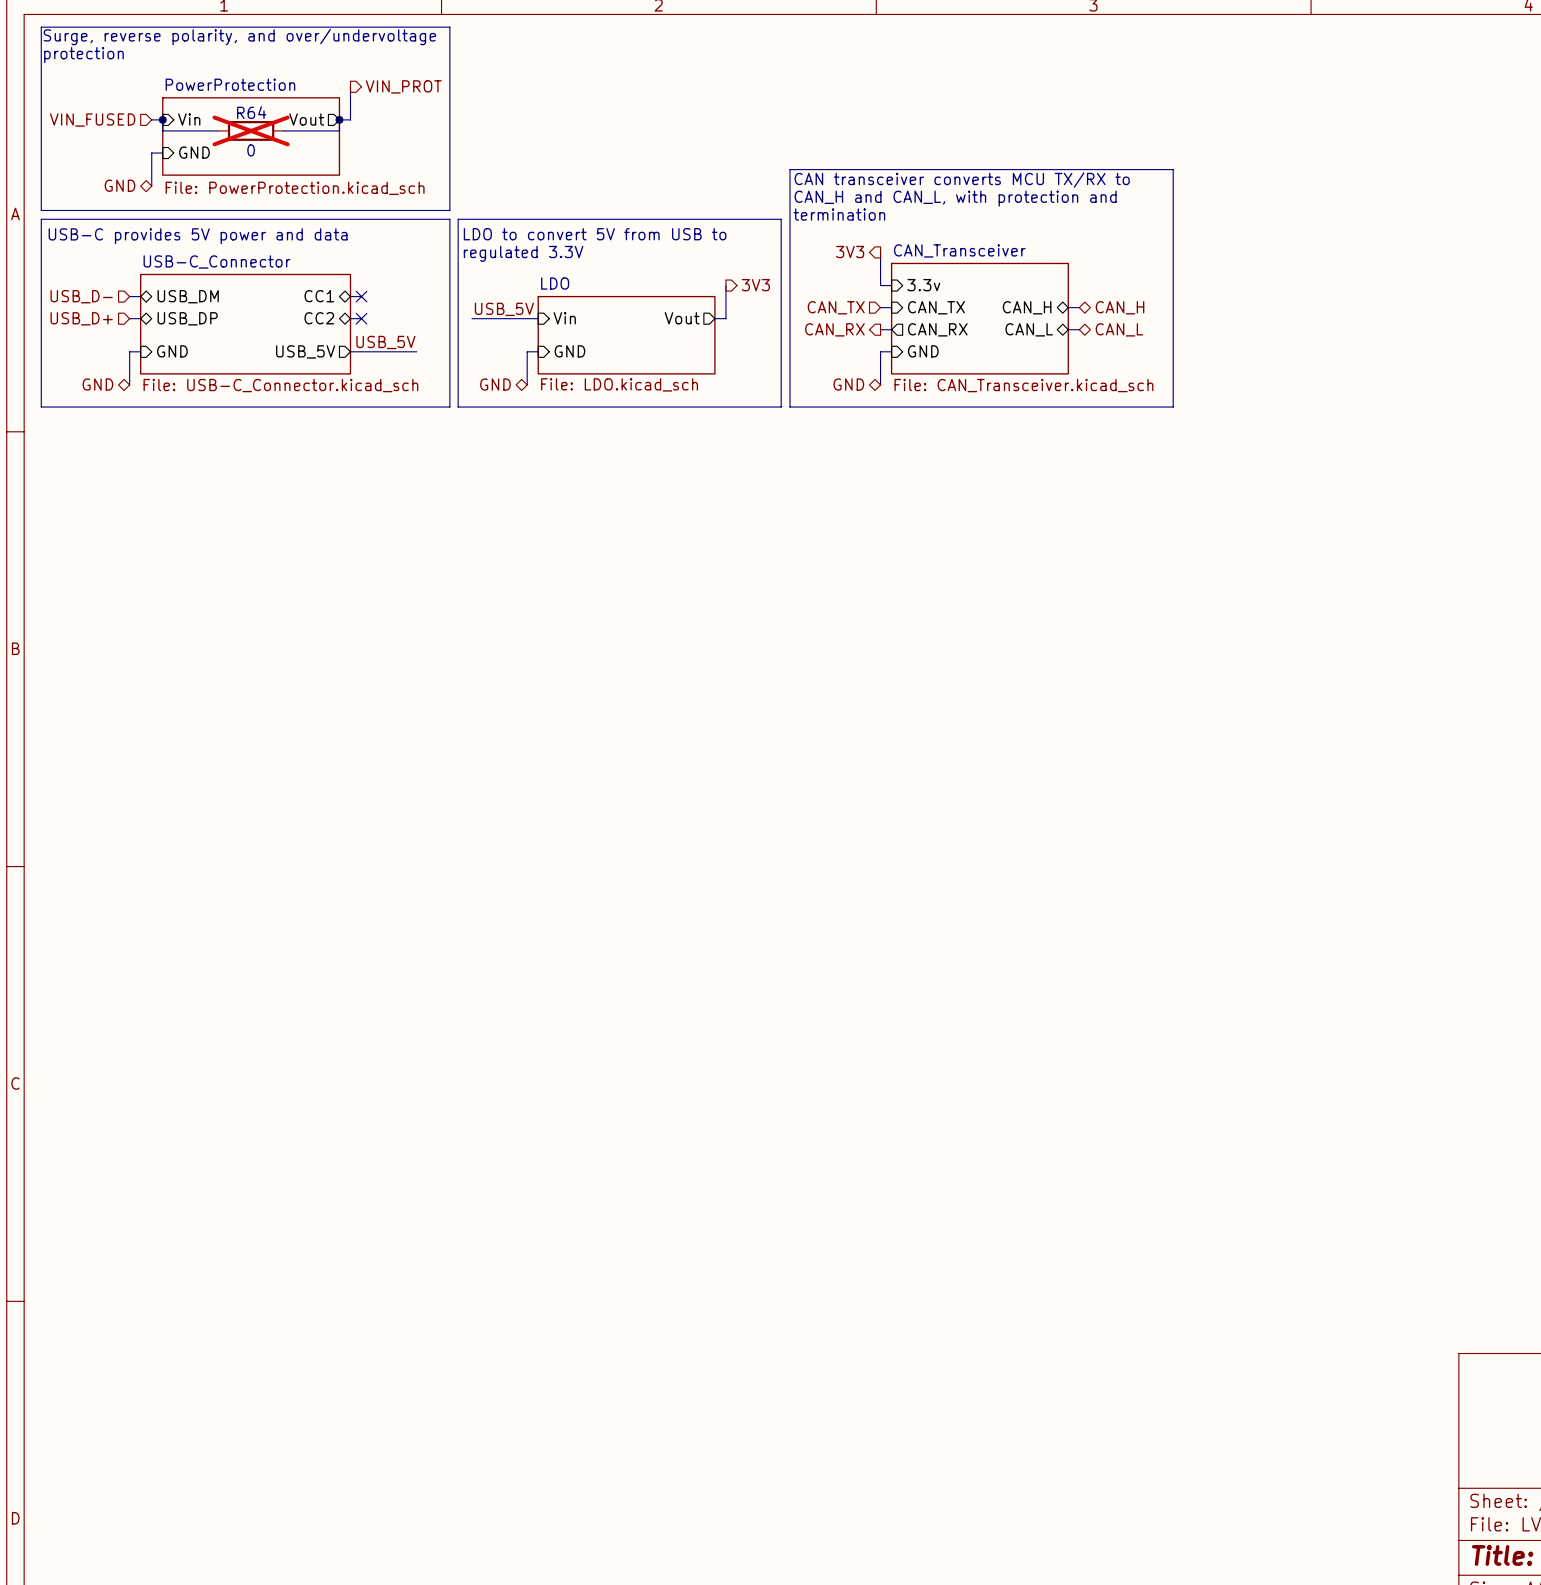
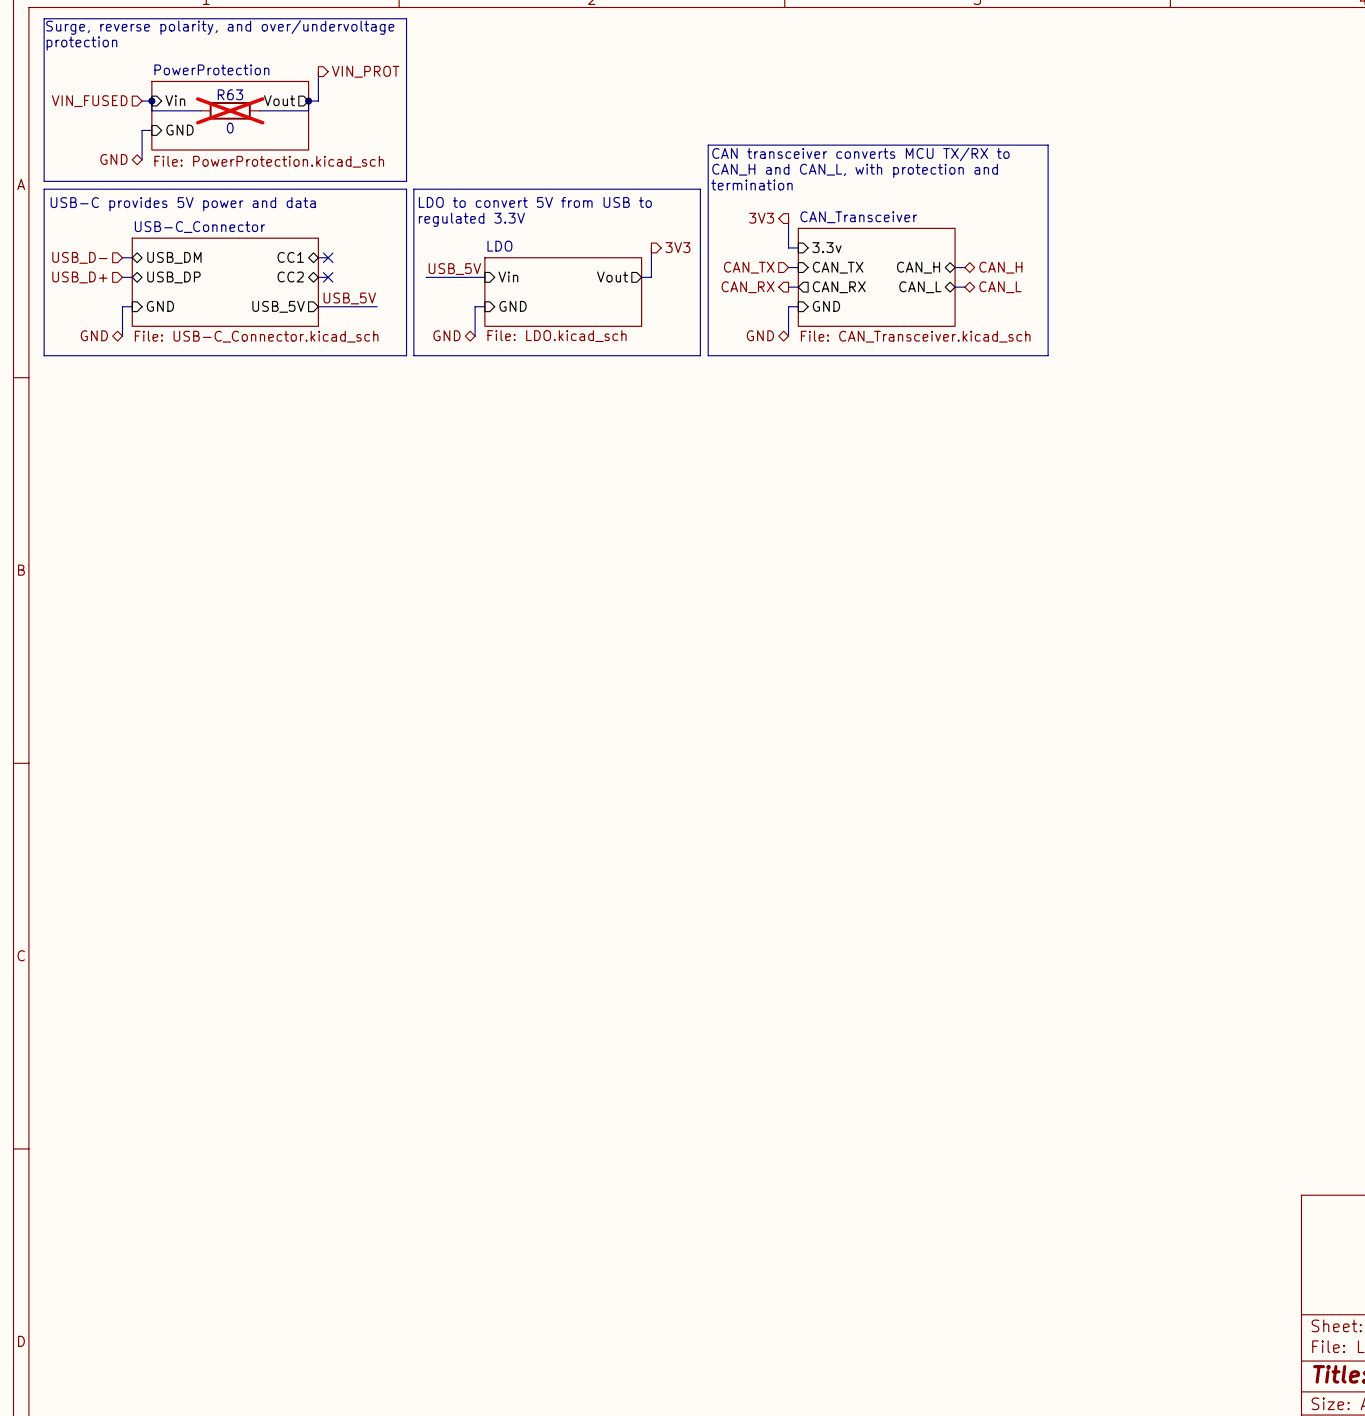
R64 name: R64 (251, 112) -> R63 (230, 94)

